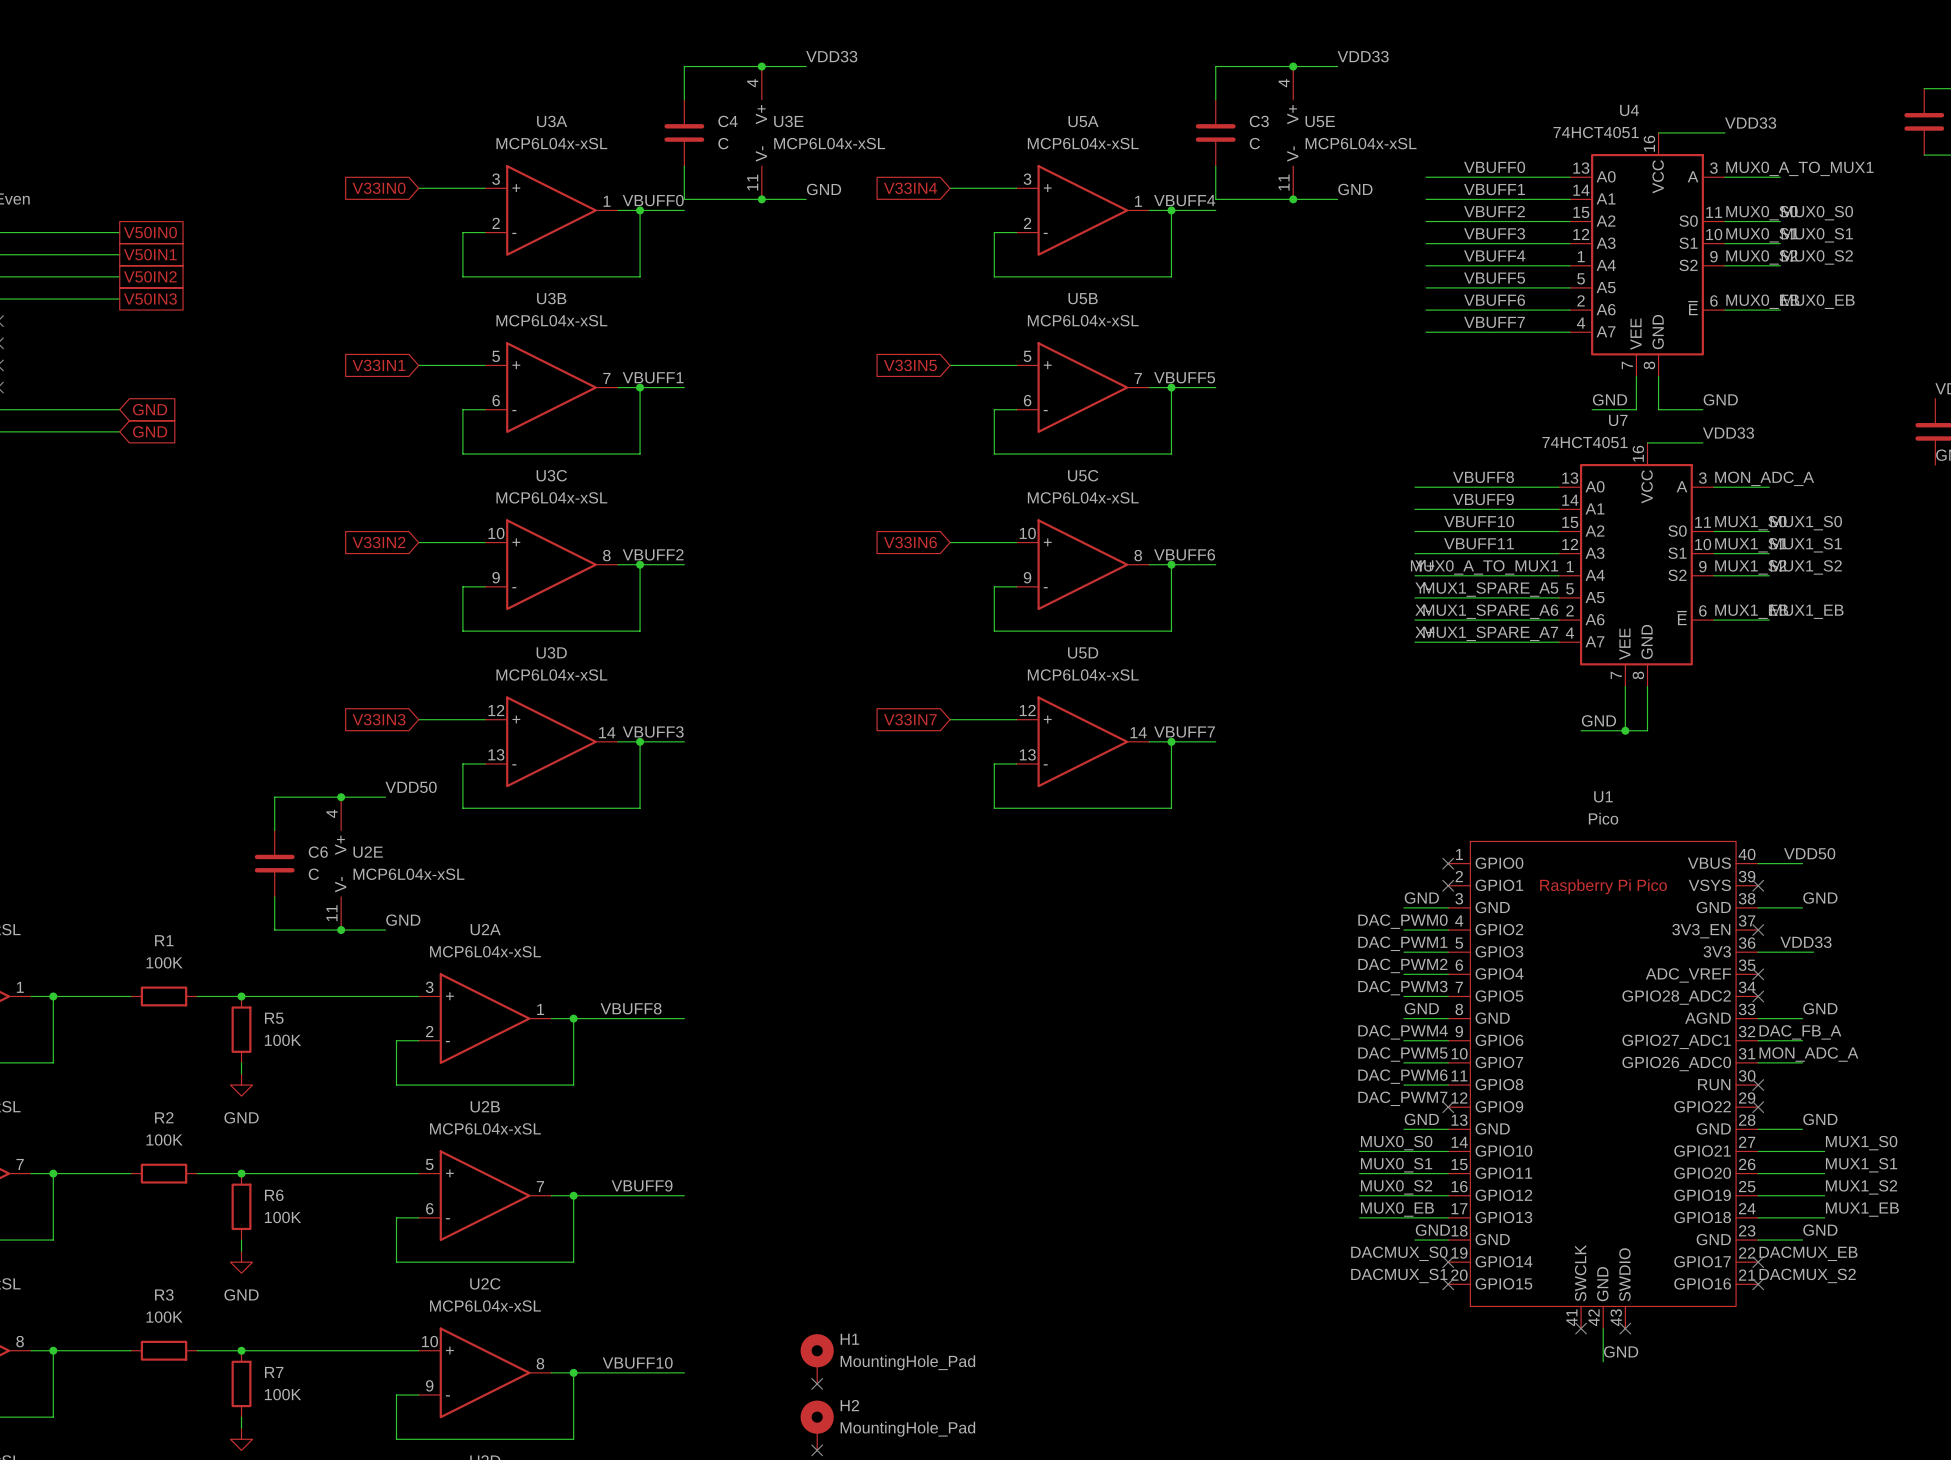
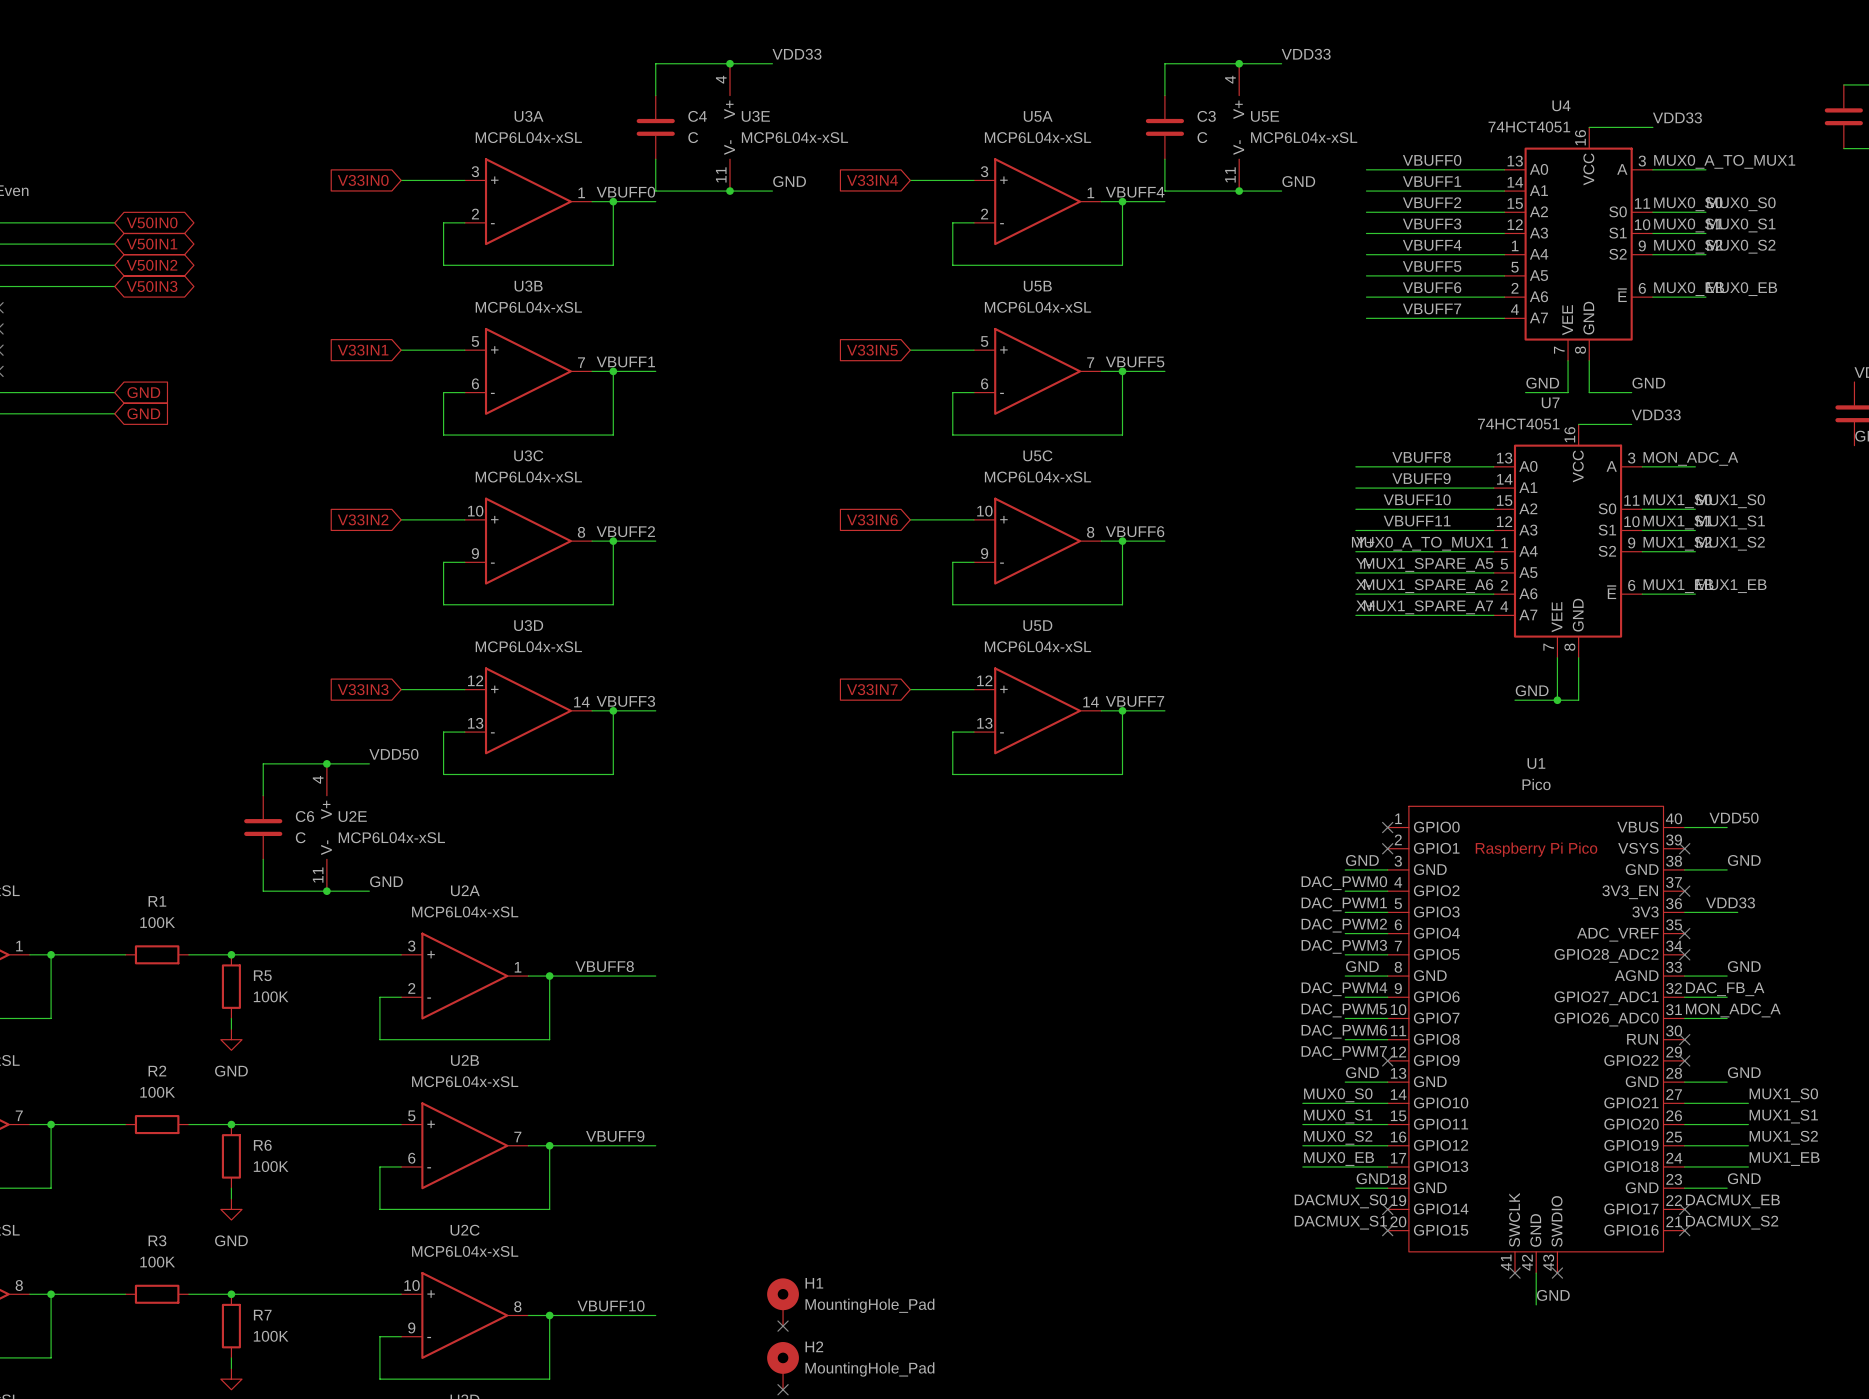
global label shape: passive (150, 232) -> bidirectional (152, 222)
global label shape: passive (150, 254) -> bidirectional (152, 244)
global label shape: passive (150, 276) -> bidirectional (152, 265)
global label shape: passive (150, 299) -> bidirectional (152, 286)

